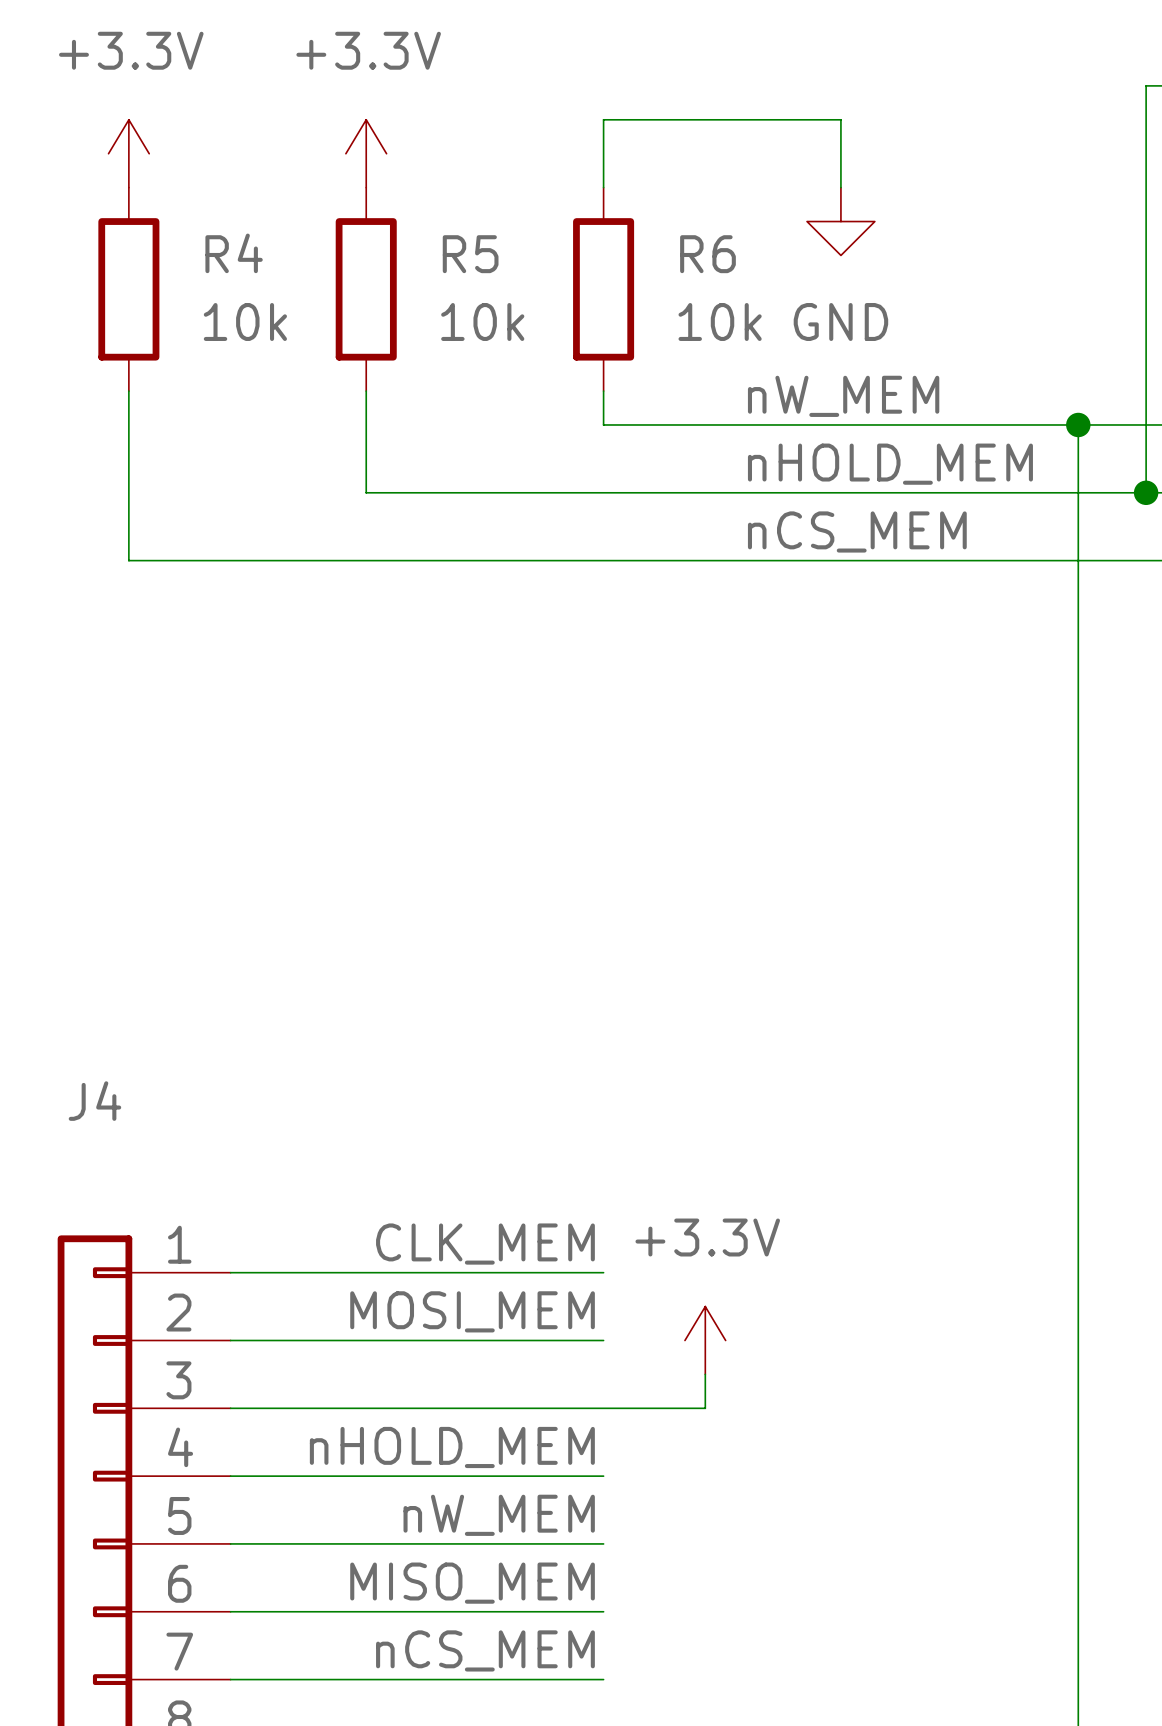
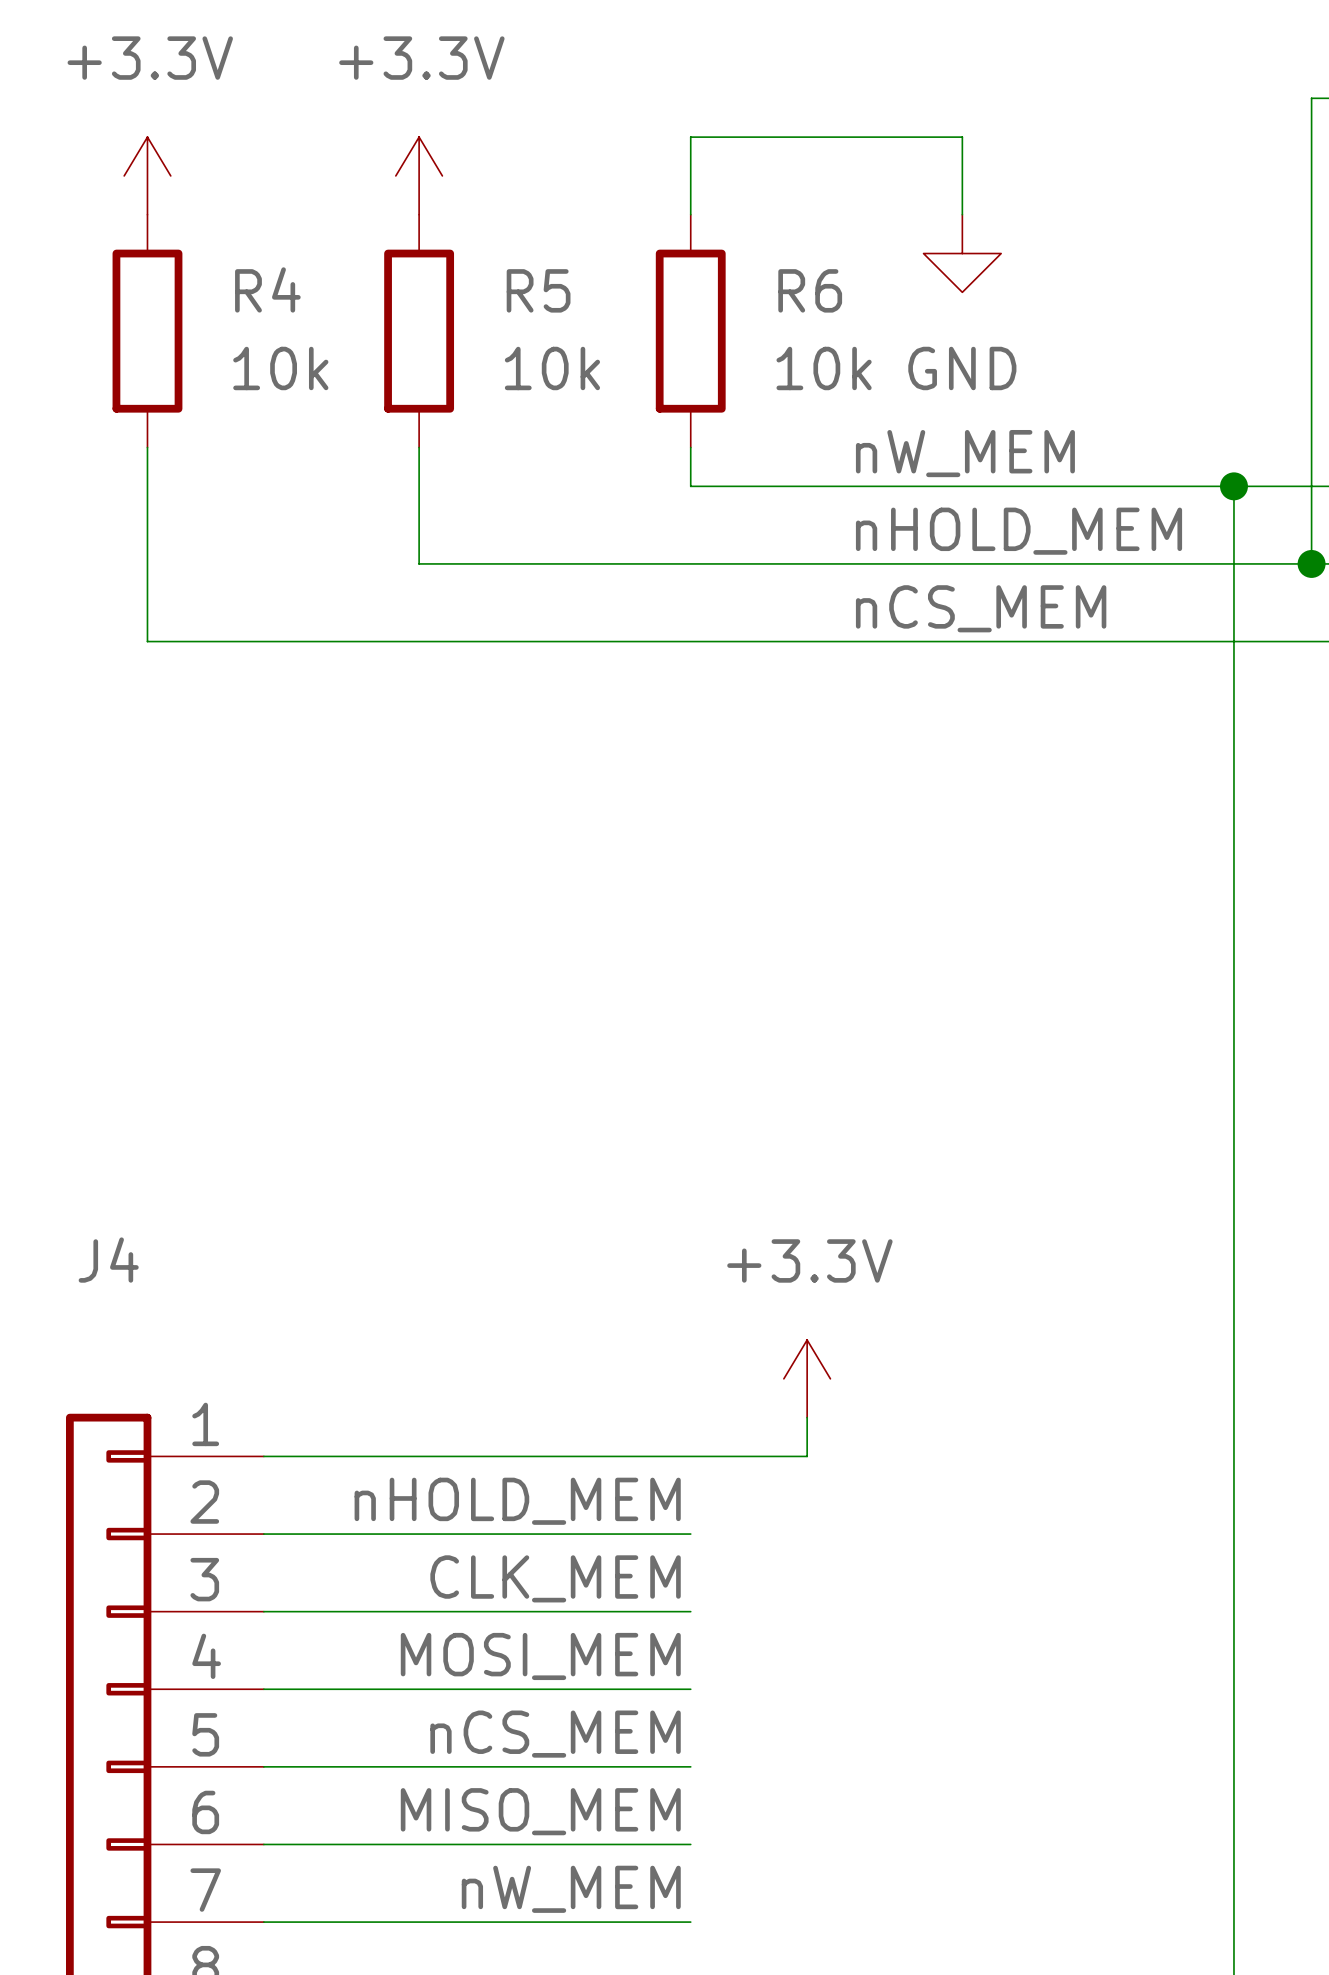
label position: CLK_MEM (485, 1244) -> CLK_MEM (555, 1578)
label: MOSI_MEM (472, 1311) -> nHOLD_MEM (517, 1501)
power symbol position: +3.3V (705, 1340) -> +3.3V (807, 1378)
wire: (705, 1374) (705, 1408) (603, 1408) -> (807, 1417) (807, 1456) (690, 1456)
label: nHOLD_MEM (452, 1447) -> MOSI_MEM (540, 1656)
label: nW_MEM (499, 1515) -> nCS_MEM (555, 1734)
label: nCS_MEM (485, 1650) -> nW_MEM (571, 1889)

